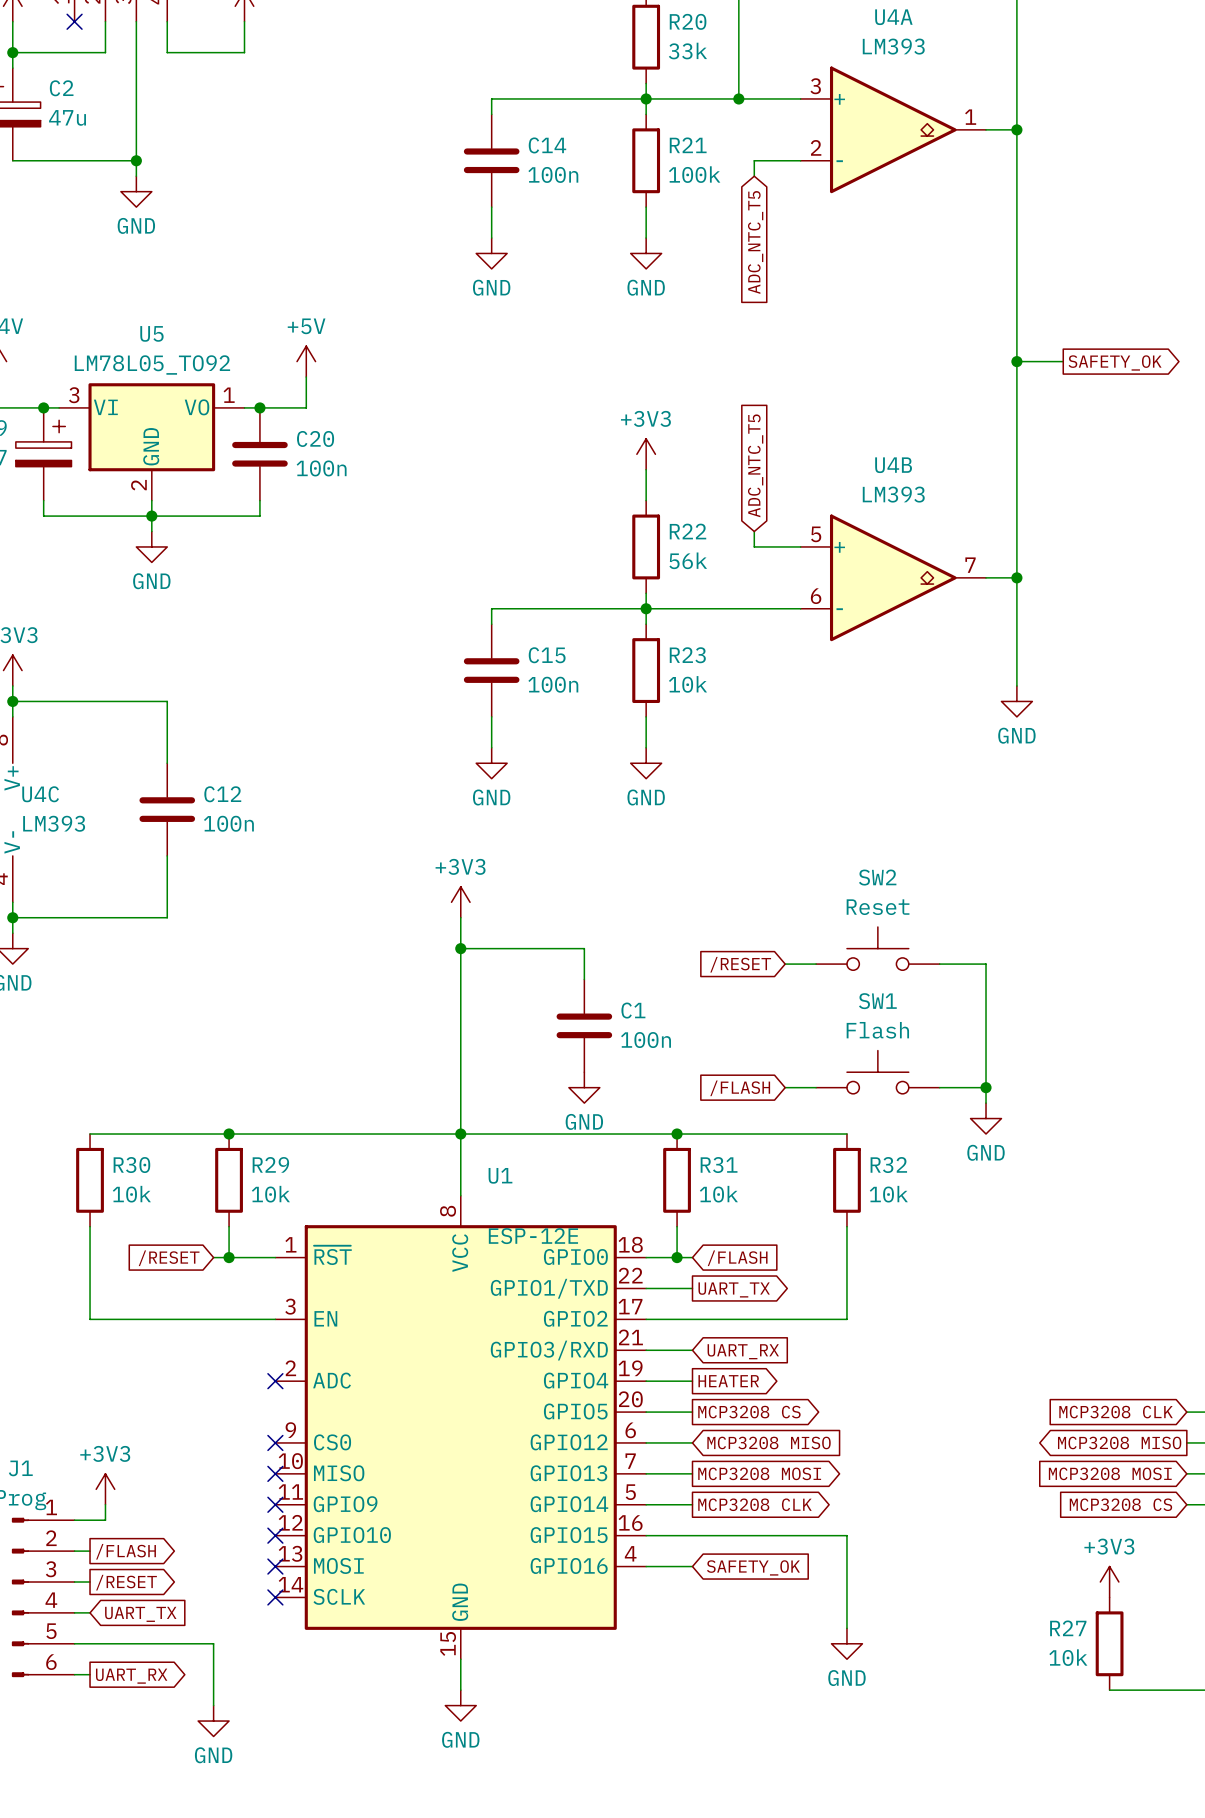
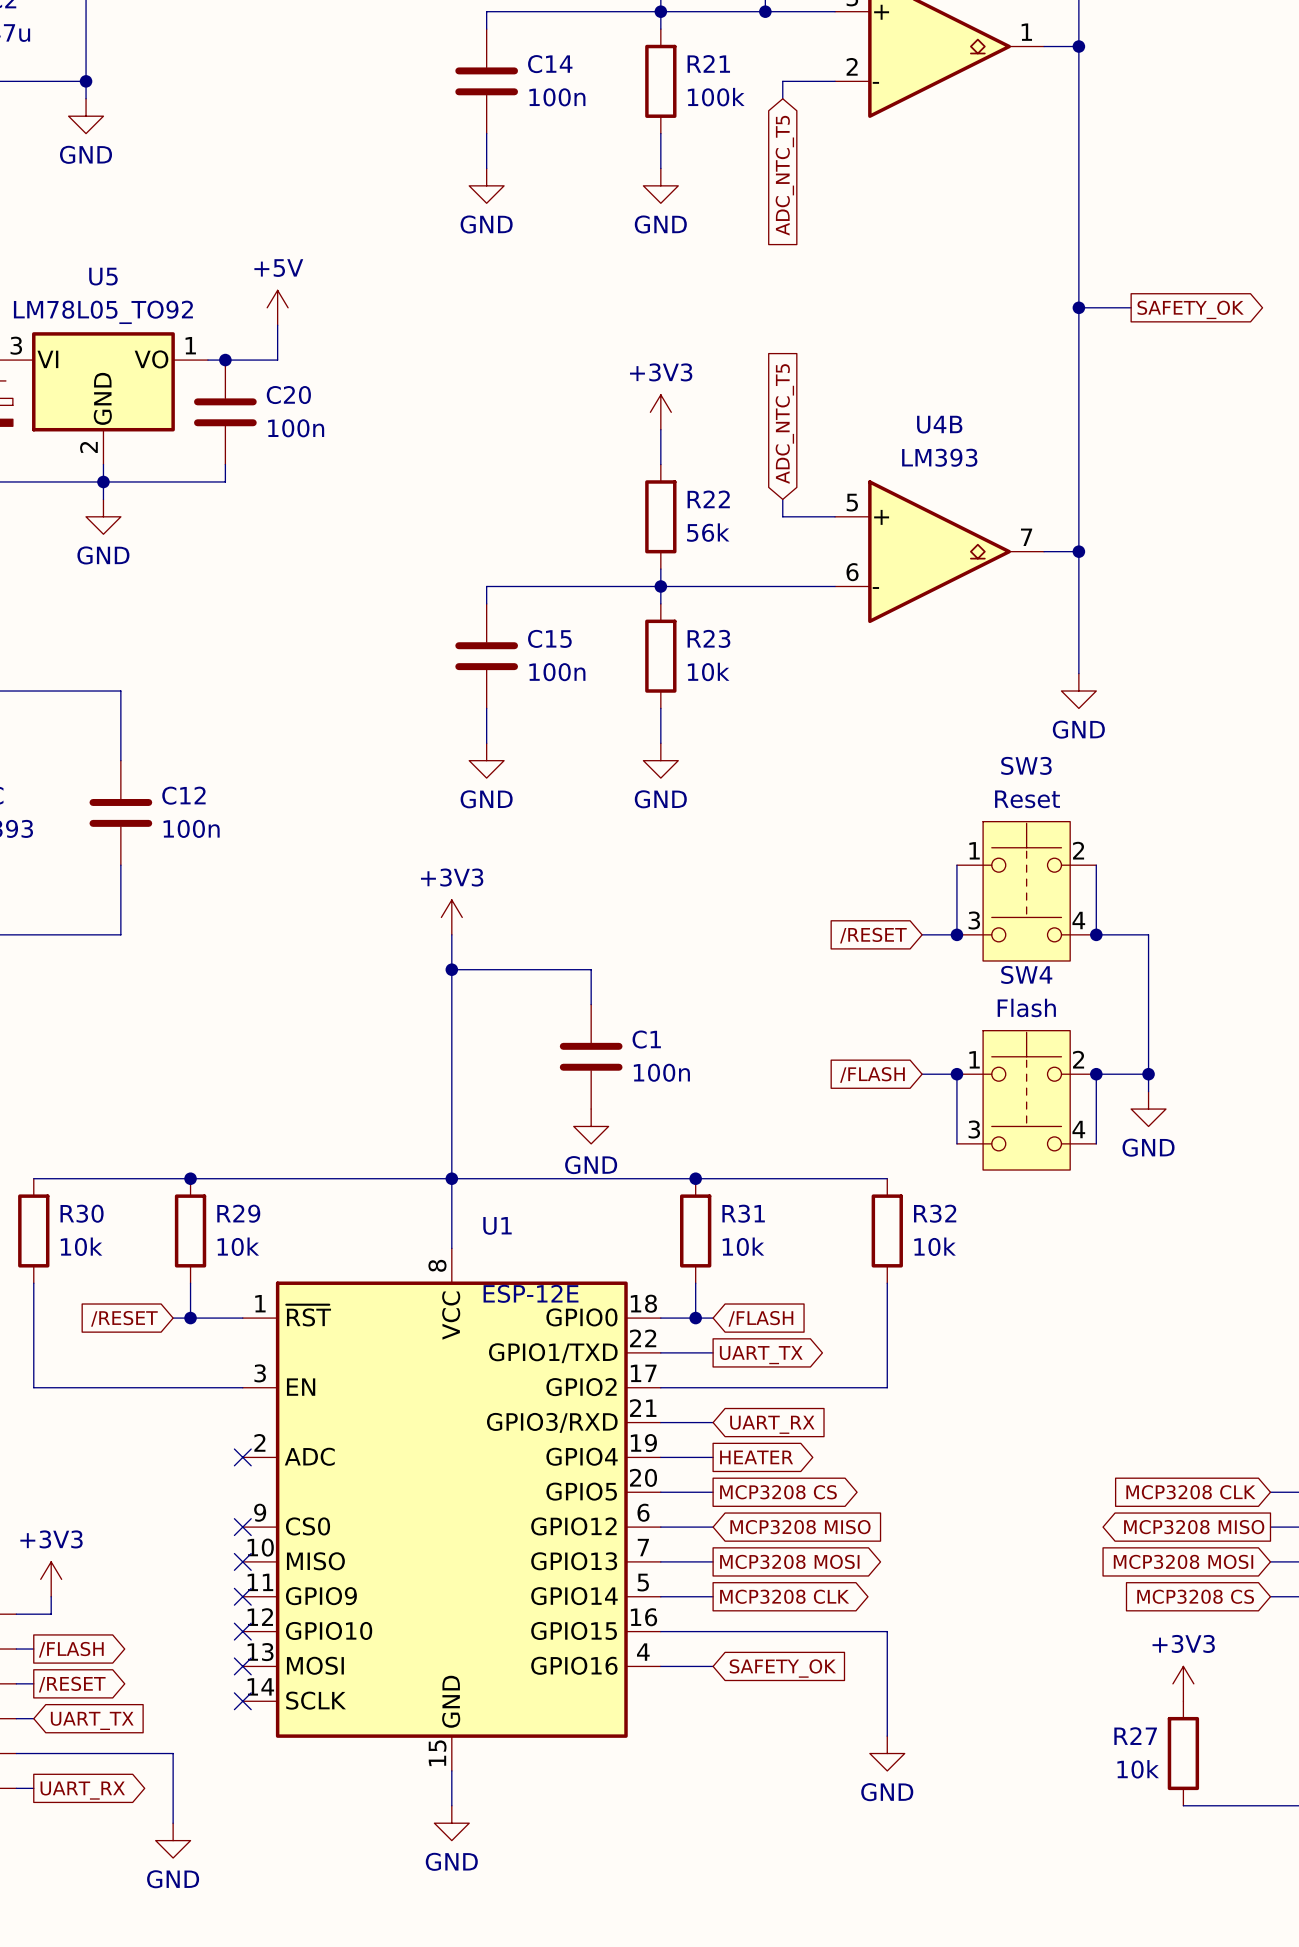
wire: none -> (956, 865) (956, 934) (922, 934)
wire: none -> (1096, 865) (1096, 934) (1148, 934) (1148, 1091)
SW3: none -> Reset (1026, 891)
junction: none -> (956, 934)
junction: none -> (1096, 934)
SW2: Reset (877, 948) -> none
global label position: /RESET (740, 964) -> /RESET (873, 935)
wire: (785, 964) (816, 964) -> none
wire: (939, 964) (986, 964) (986, 1103) -> none
wire: none -> (922, 1074) (956, 1074) (956, 1143)
junction: none -> (956, 1074)
junction: none -> (1096, 1074)
wire: none -> (1148, 1074) (1096, 1074) (1096, 1143)
junction: none -> (1148, 1074)
SW4: none -> Flash (1026, 1100)
SW1: Flash (877, 1072) -> none
wire: (785, 1087) (816, 1087) -> none
junction: (986, 1087) -> none
global label position: /FLASH (740, 1088) -> /FLASH (872, 1074)
power symbol position: GND (986, 1118) -> GND (1148, 1109)

